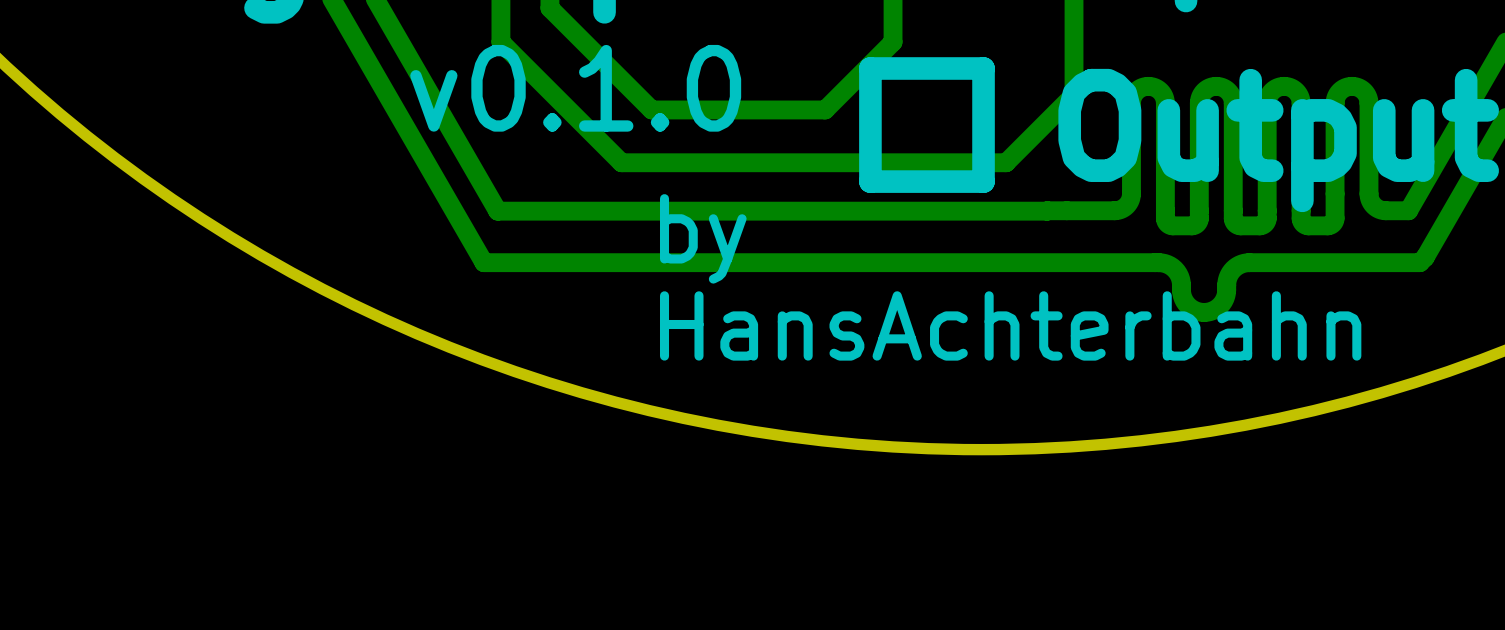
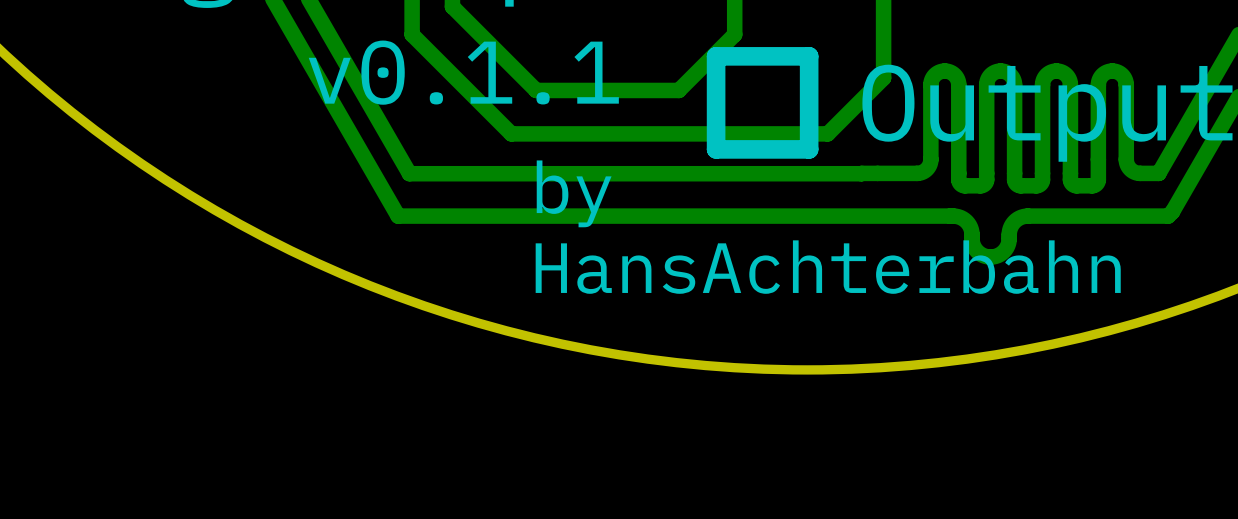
text: v0.1.0 (575, 88) -> v0.1.1 (463, 72)

